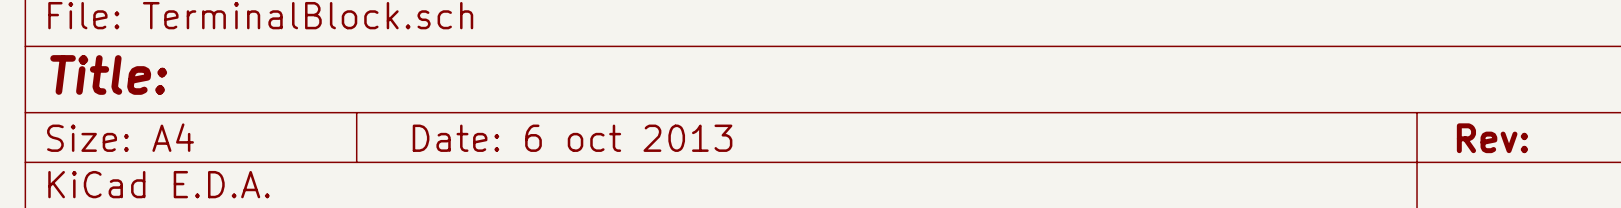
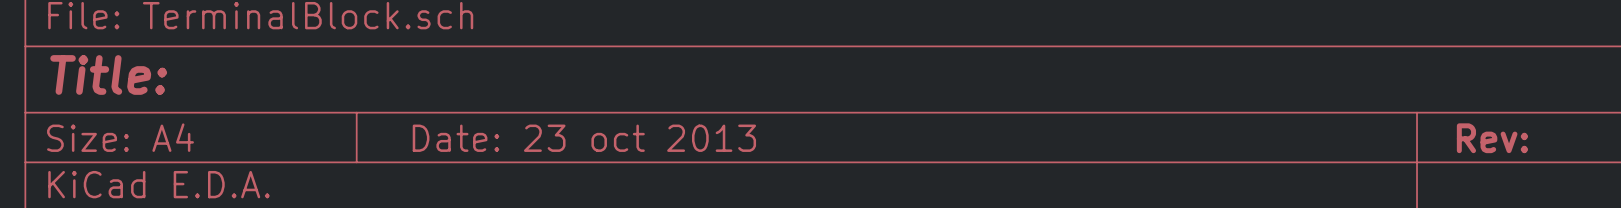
title block: Date: 6 oct 2013 (572, 138) -> Date: 23 oct 2013 (584, 138)

